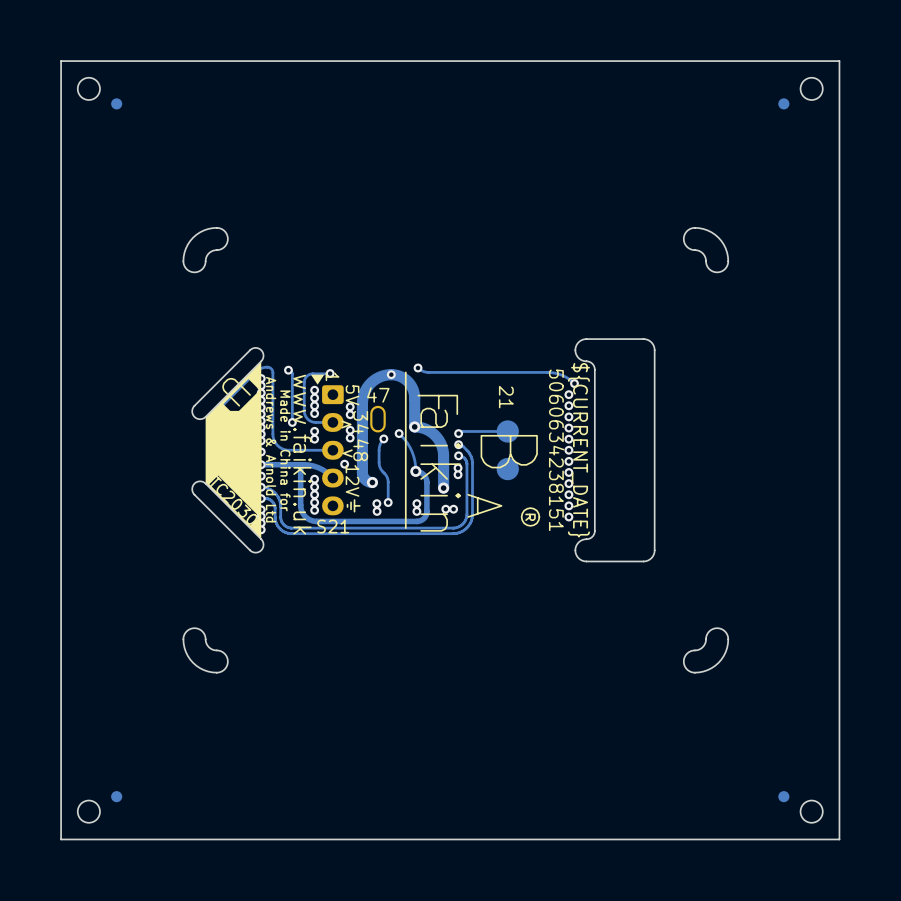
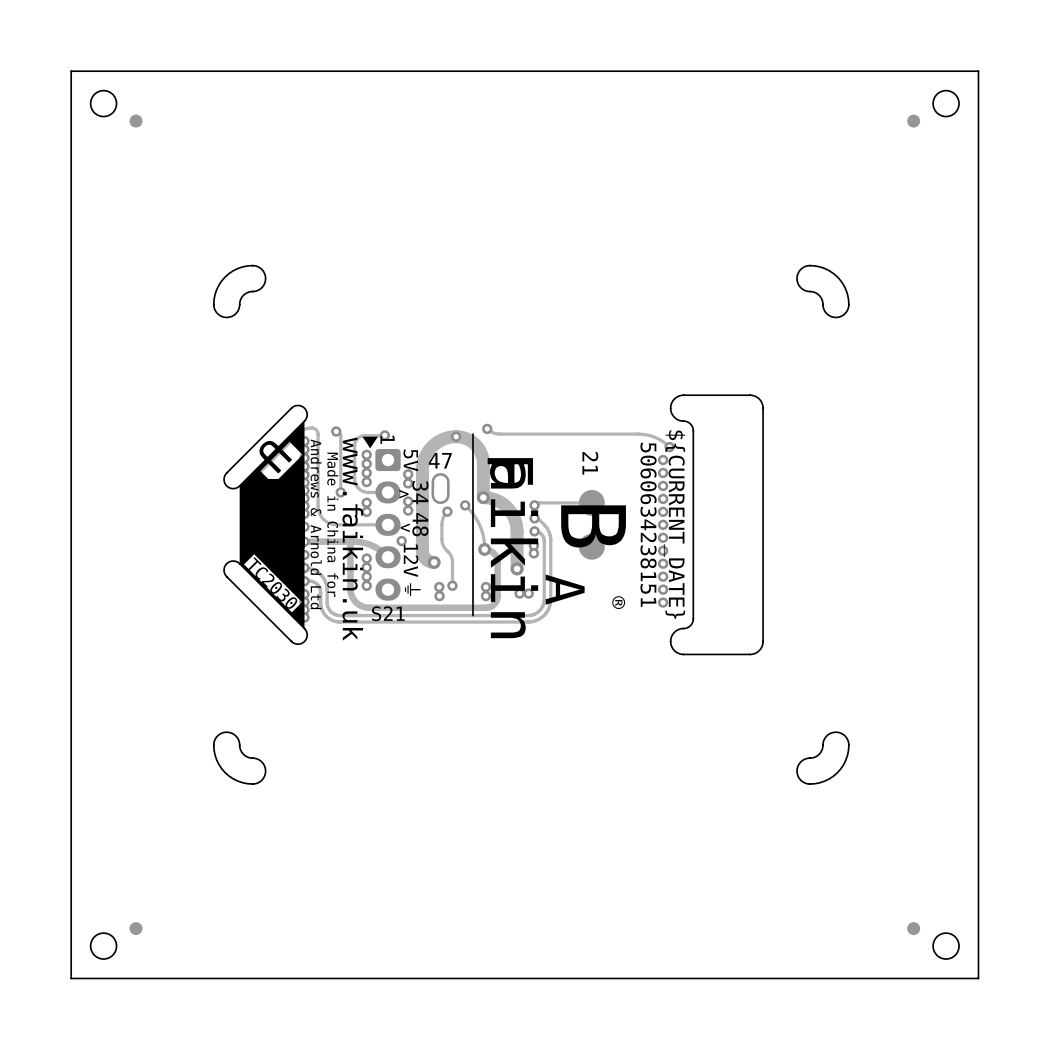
via: (314, 510) -> none

